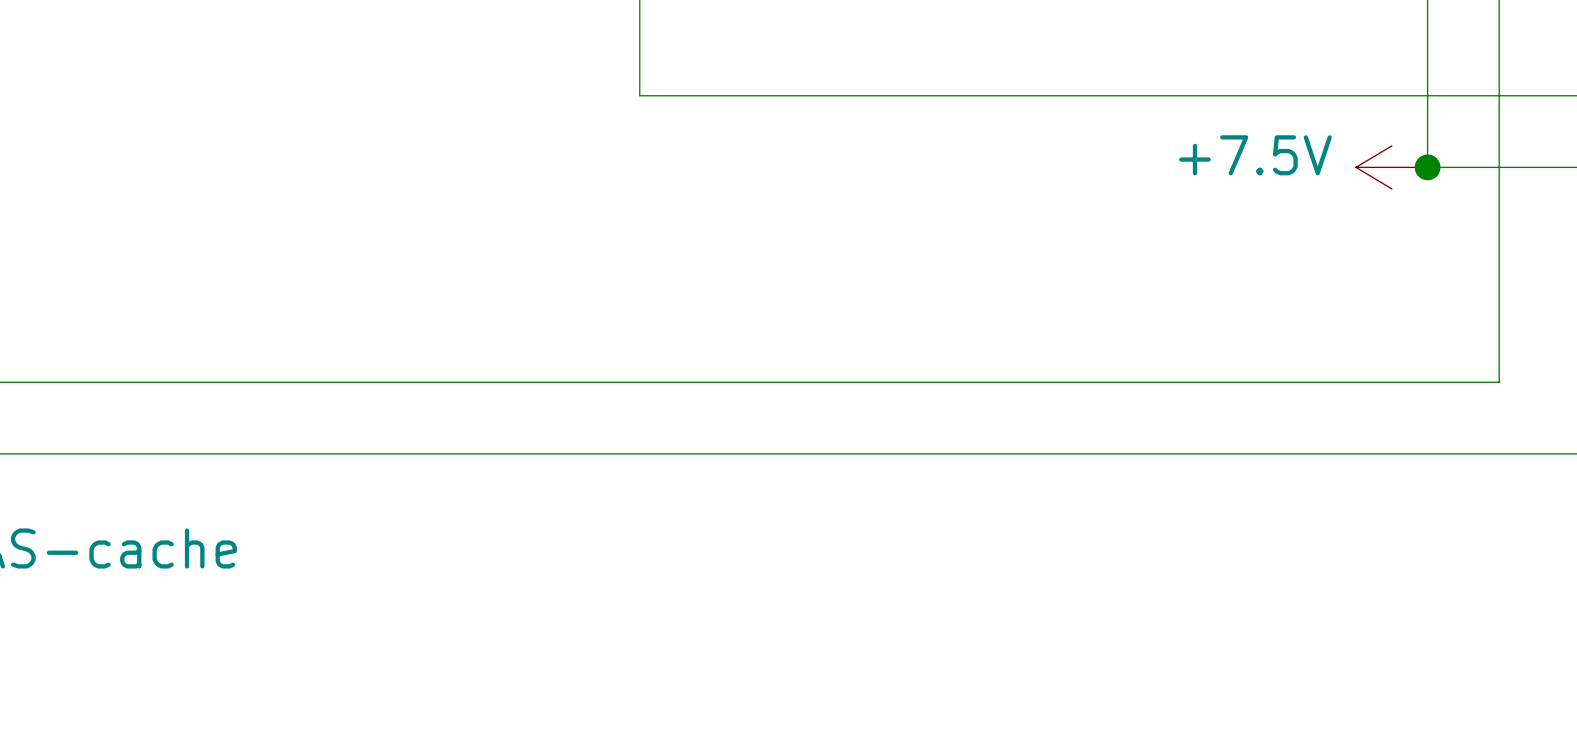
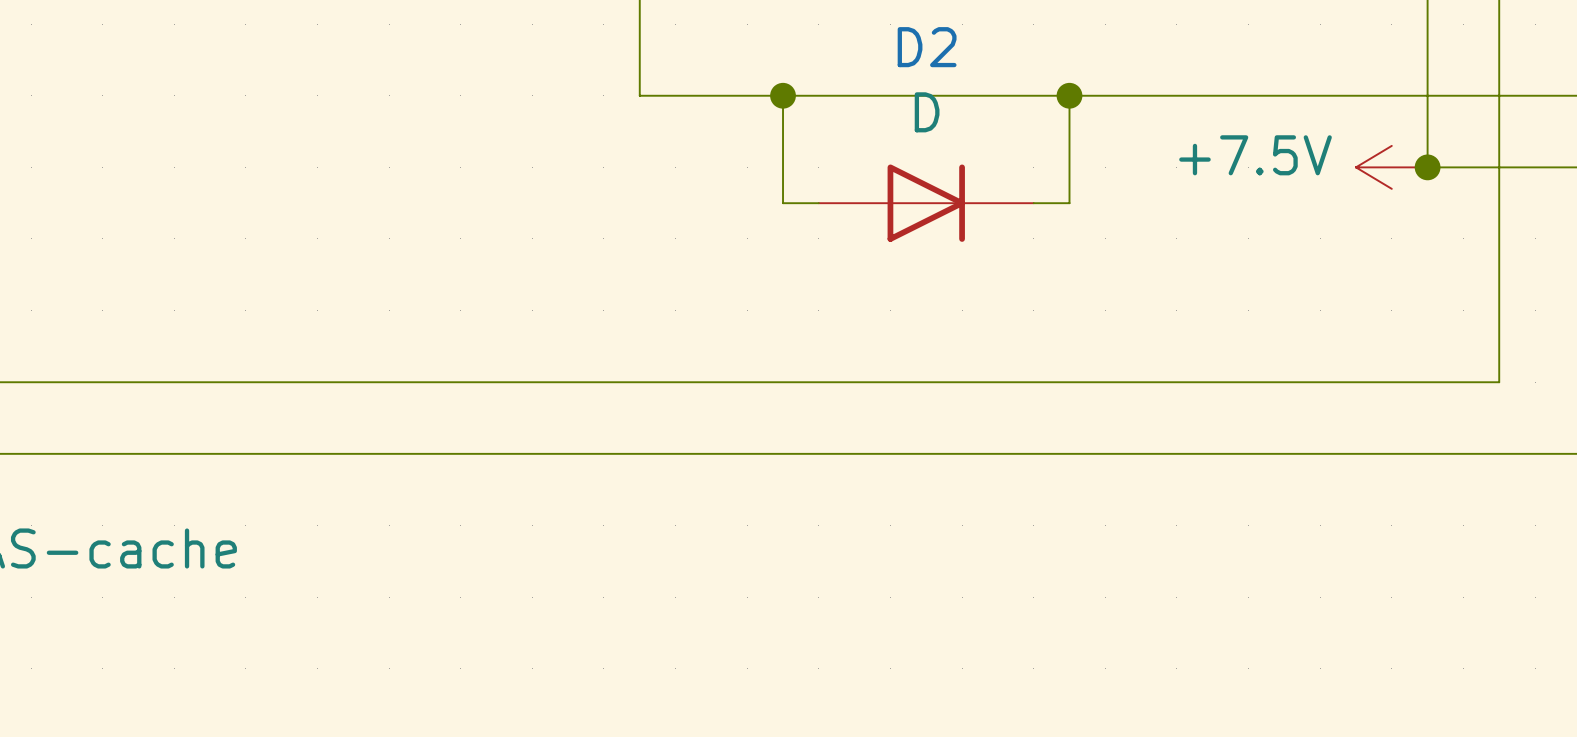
wire: none -> (783, 95) (783, 203) (818, 203)
junction: none -> (783, 95)
wire: none -> (1069, 95) (1069, 203) (1033, 203)
junction: none -> (1069, 95)
D2: none -> D (926, 203)

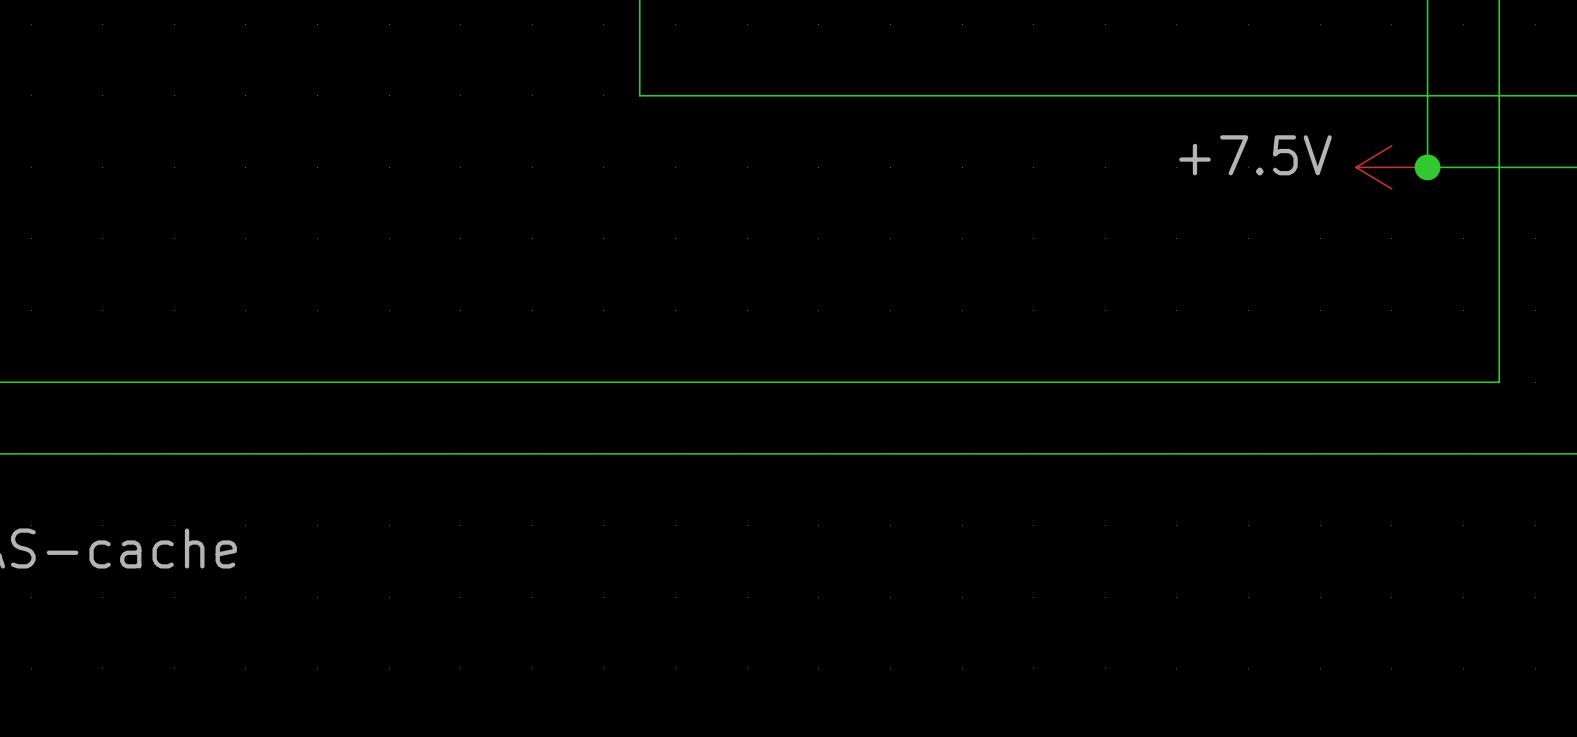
wire: (783, 95) (783, 203) (818, 203) -> none
junction: (783, 95) -> none
wire: (1069, 95) (1069, 203) (1033, 203) -> none
junction: (1069, 95) -> none
D2: D (926, 203) -> none

